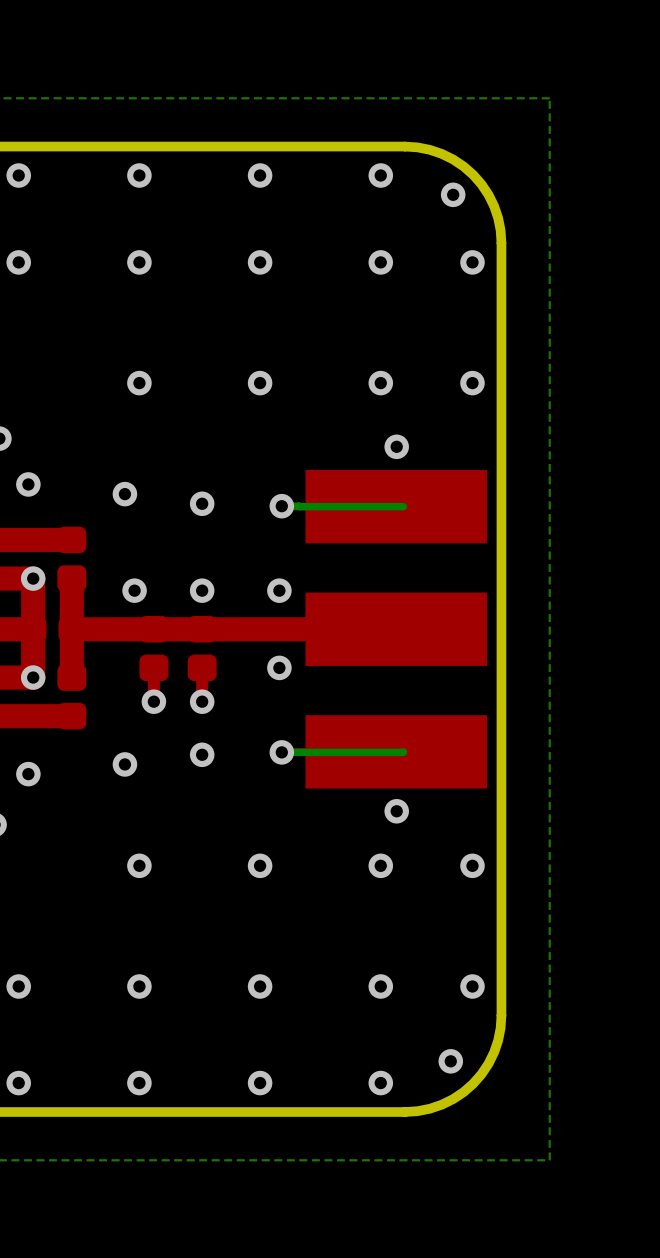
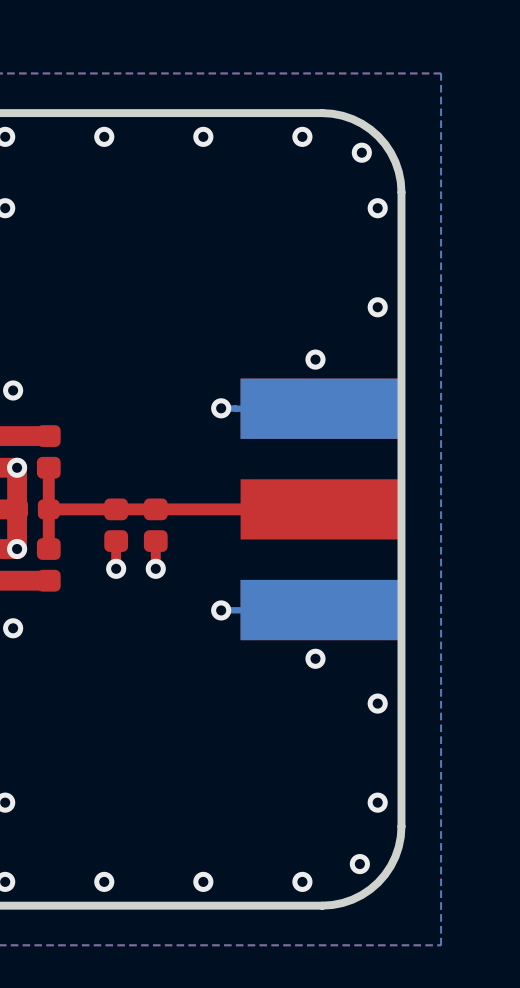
via: (139, 262) -> none
via: (260, 262) -> none
via: (380, 262) -> none
via: (139, 383) -> none
via: (260, 383) -> none
via: (380, 383) -> none
part footprint: [305, 469, 487, 789] -> [240, 378, 402, 641]
via: (124, 494) -> none
via: (202, 503) -> none
top track width: thick (71, 578) (71, 677) -> thin (48, 467) (48, 549)
via: (134, 590) -> none
via: (202, 590) -> none
via: (279, 590) -> none
top track width: thick (403, 629) (71, 629) -> thin (321, 509) (48, 509)
via: (279, 667) -> none
via: (202, 754) -> none
via: (124, 764) -> none
via: (139, 865) -> none
via: (260, 865) -> none
via: (380, 865) -> none
via: (139, 986) -> none
via: (260, 986) -> none
via: (380, 986) -> none

